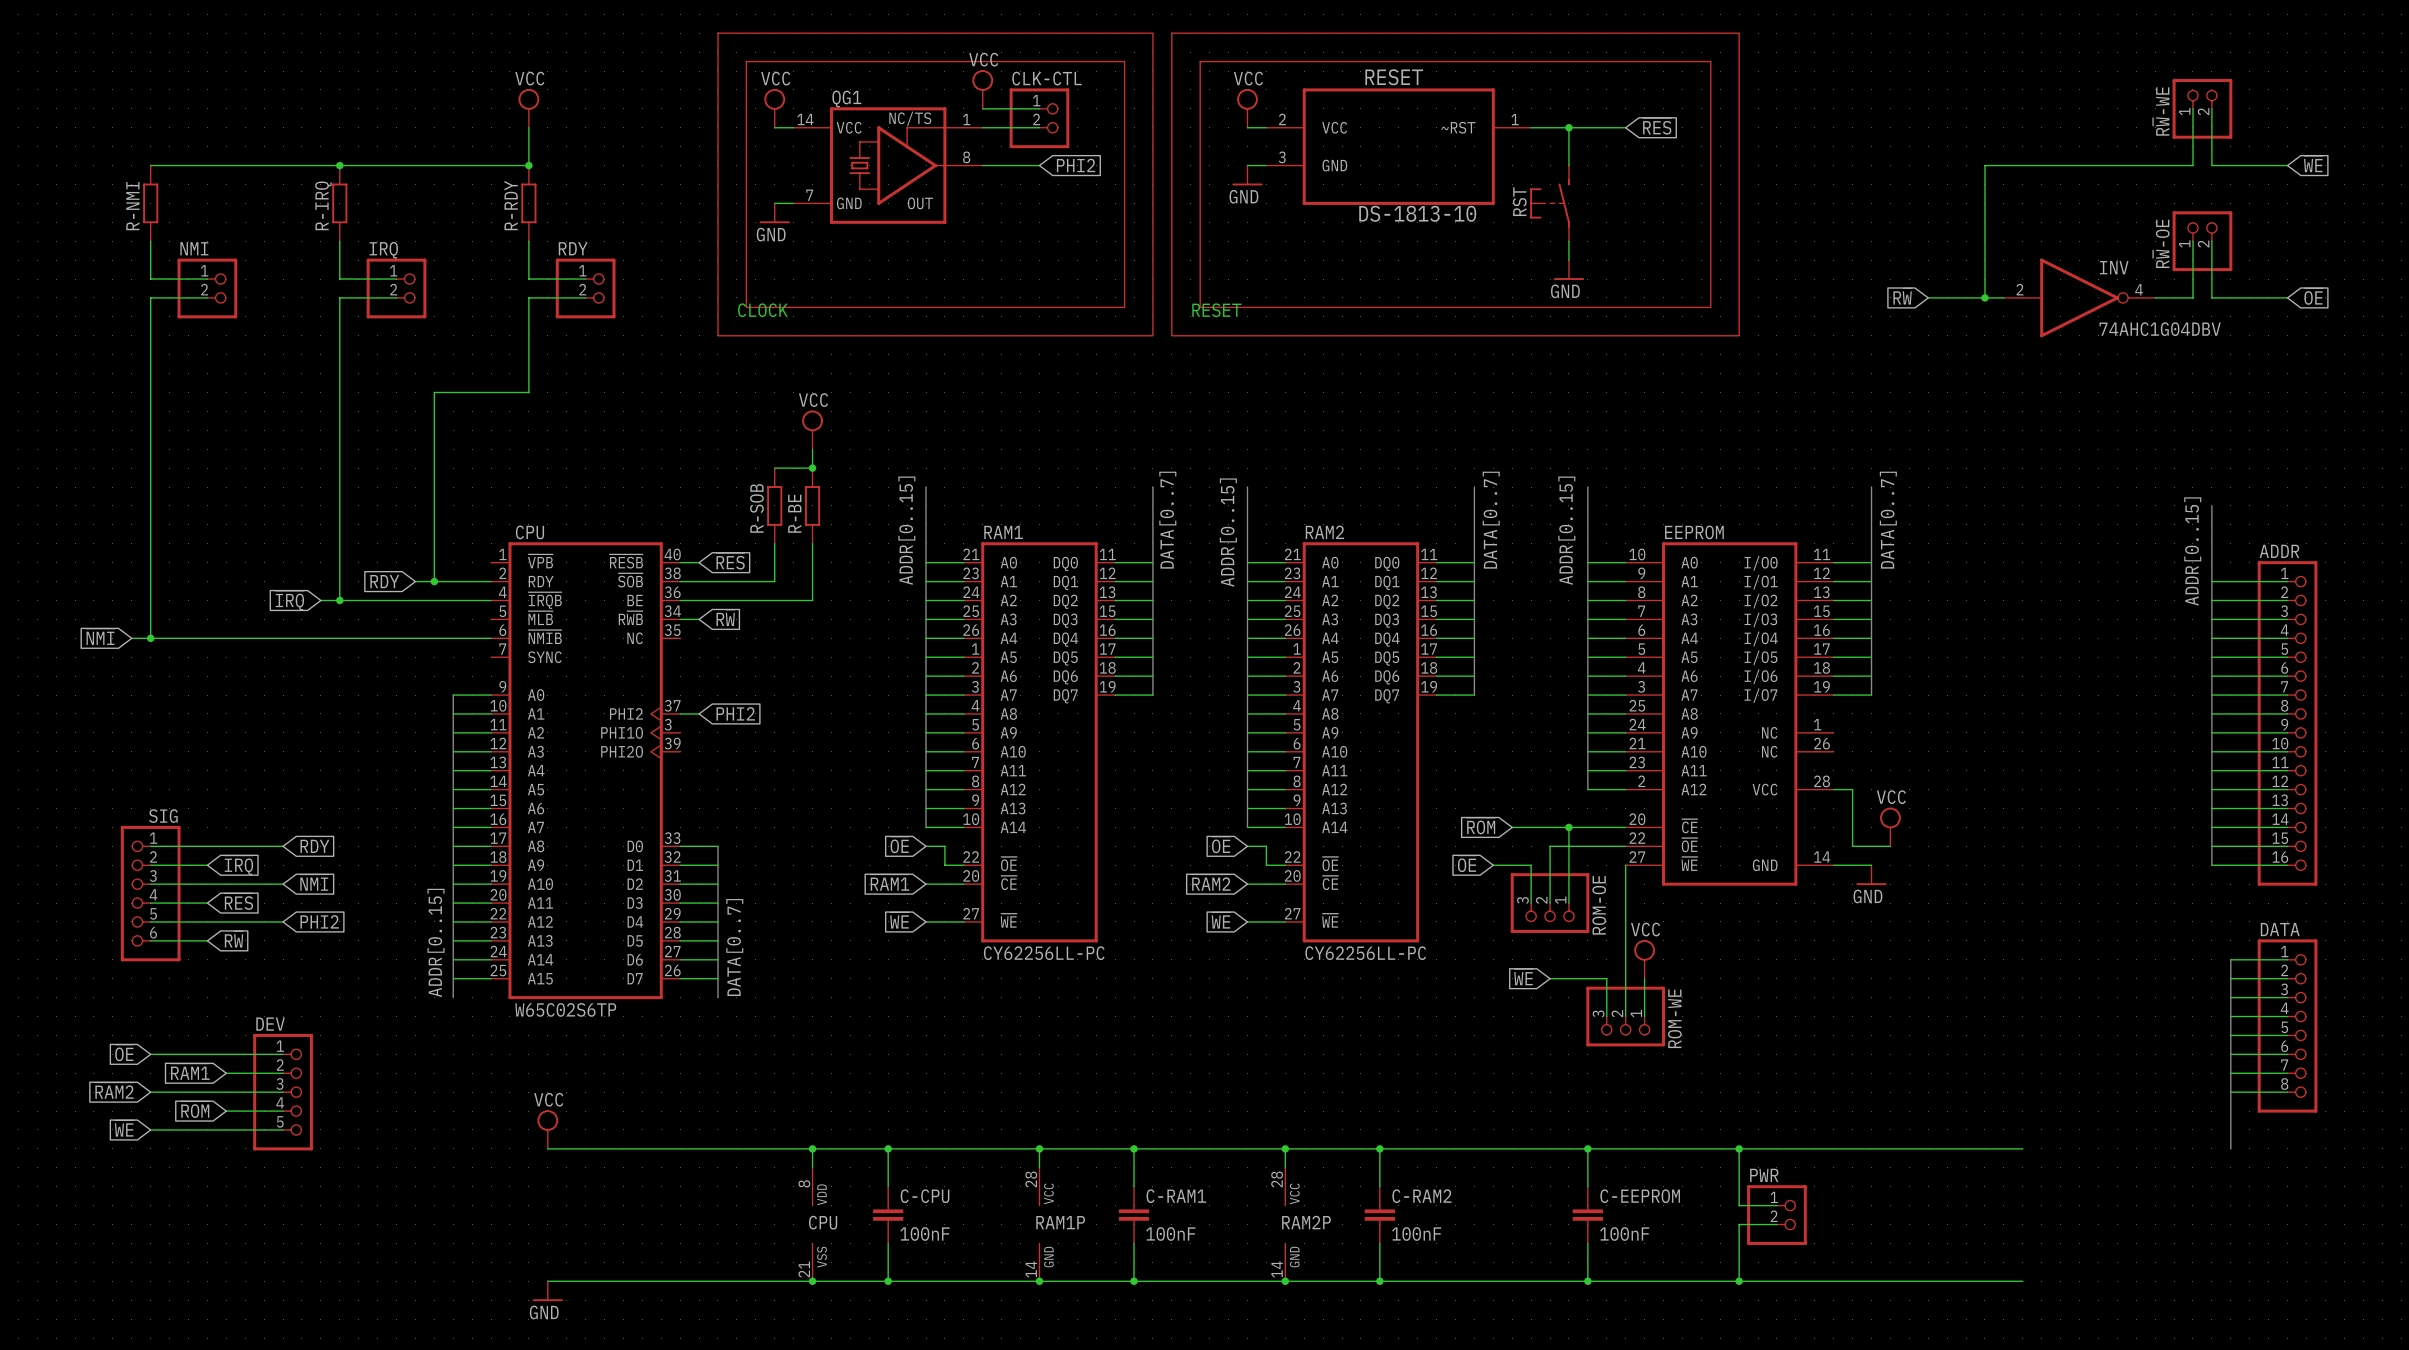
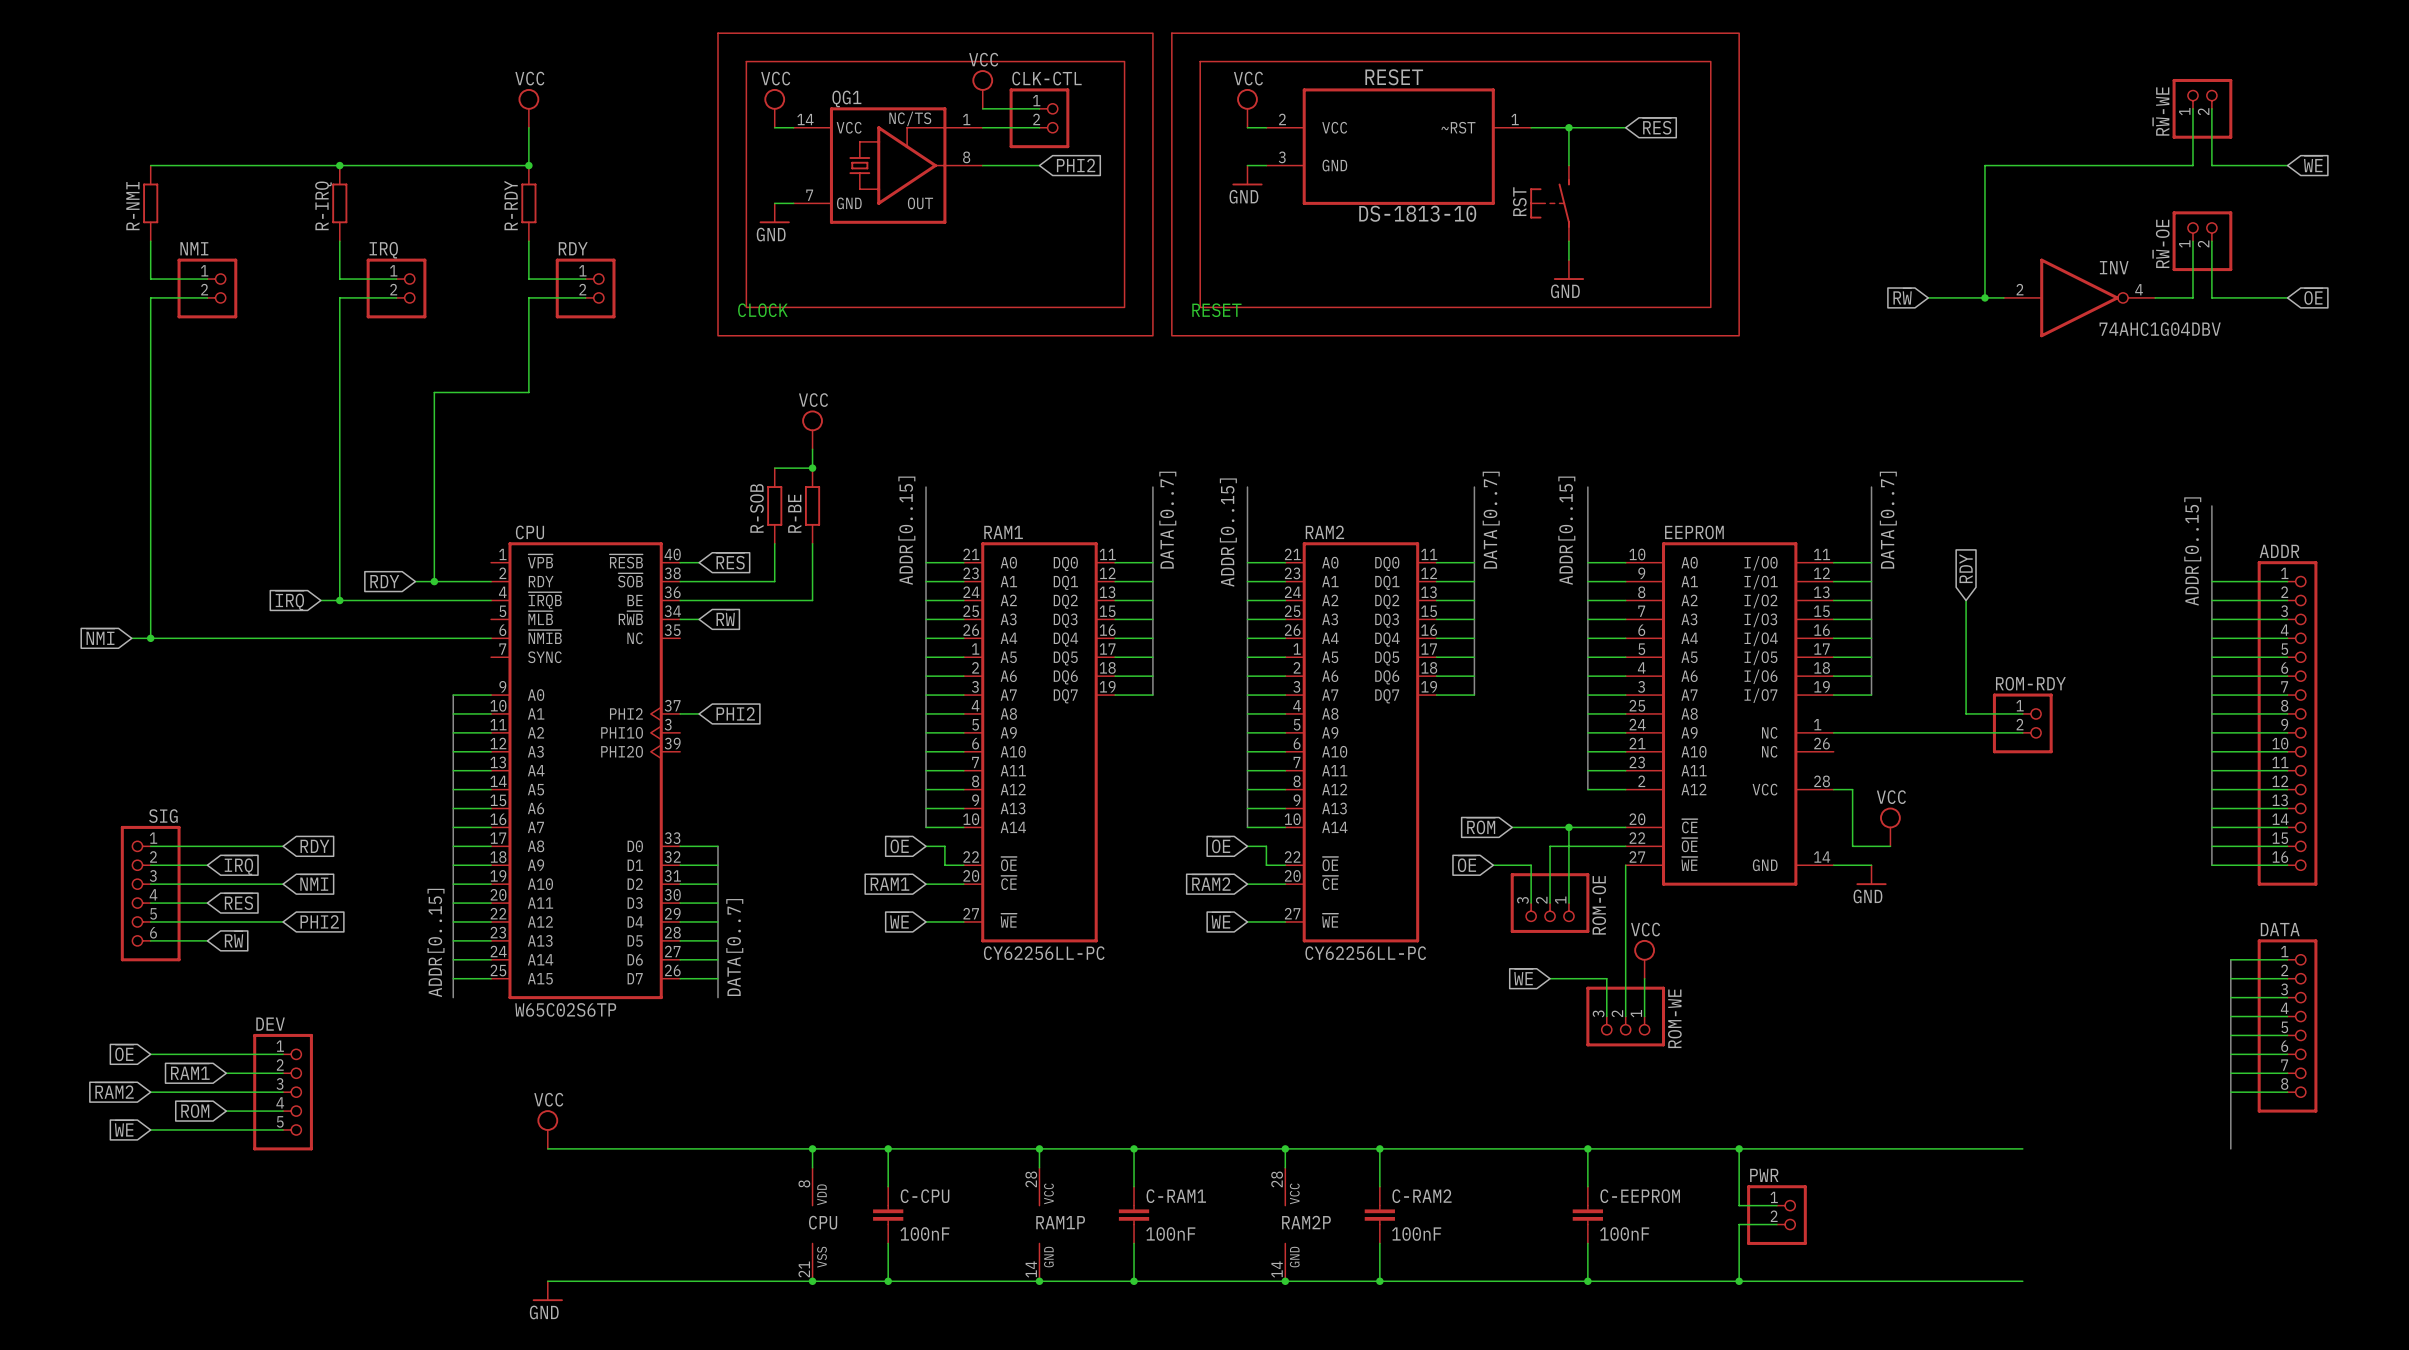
global label: none -> RDY (1966, 568)
wire: none -> (1966, 600) (1966, 713) (2022, 713)
ROM-RDY: none -> (2022, 723)
wire: none -> (1833, 732) (2022, 732)

